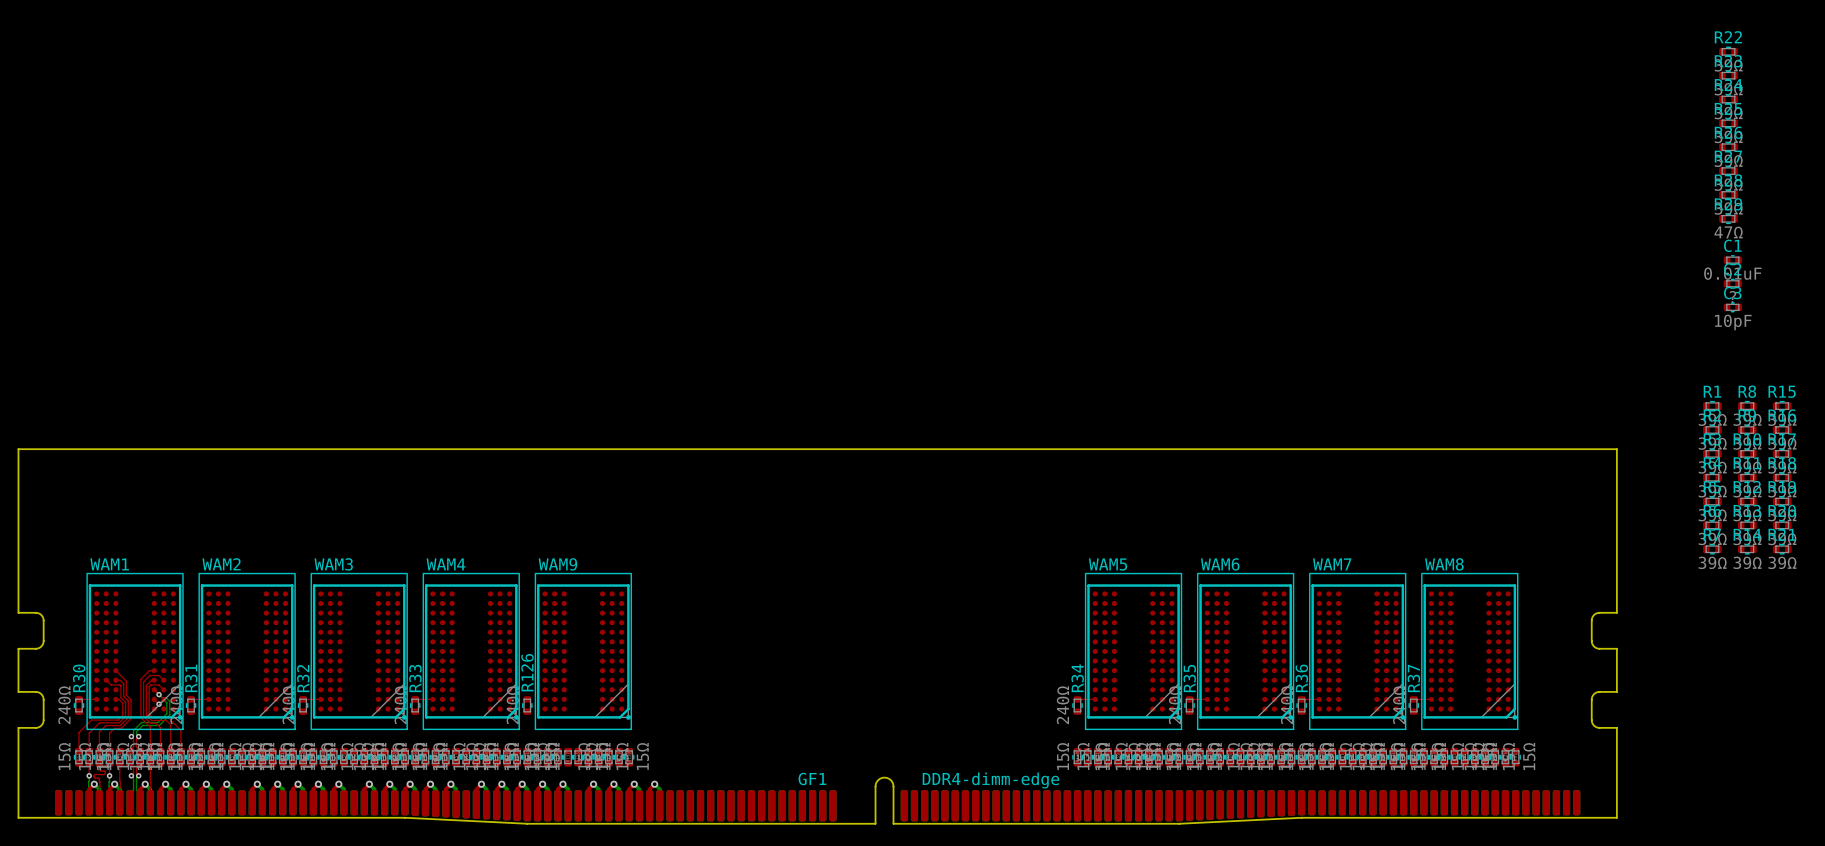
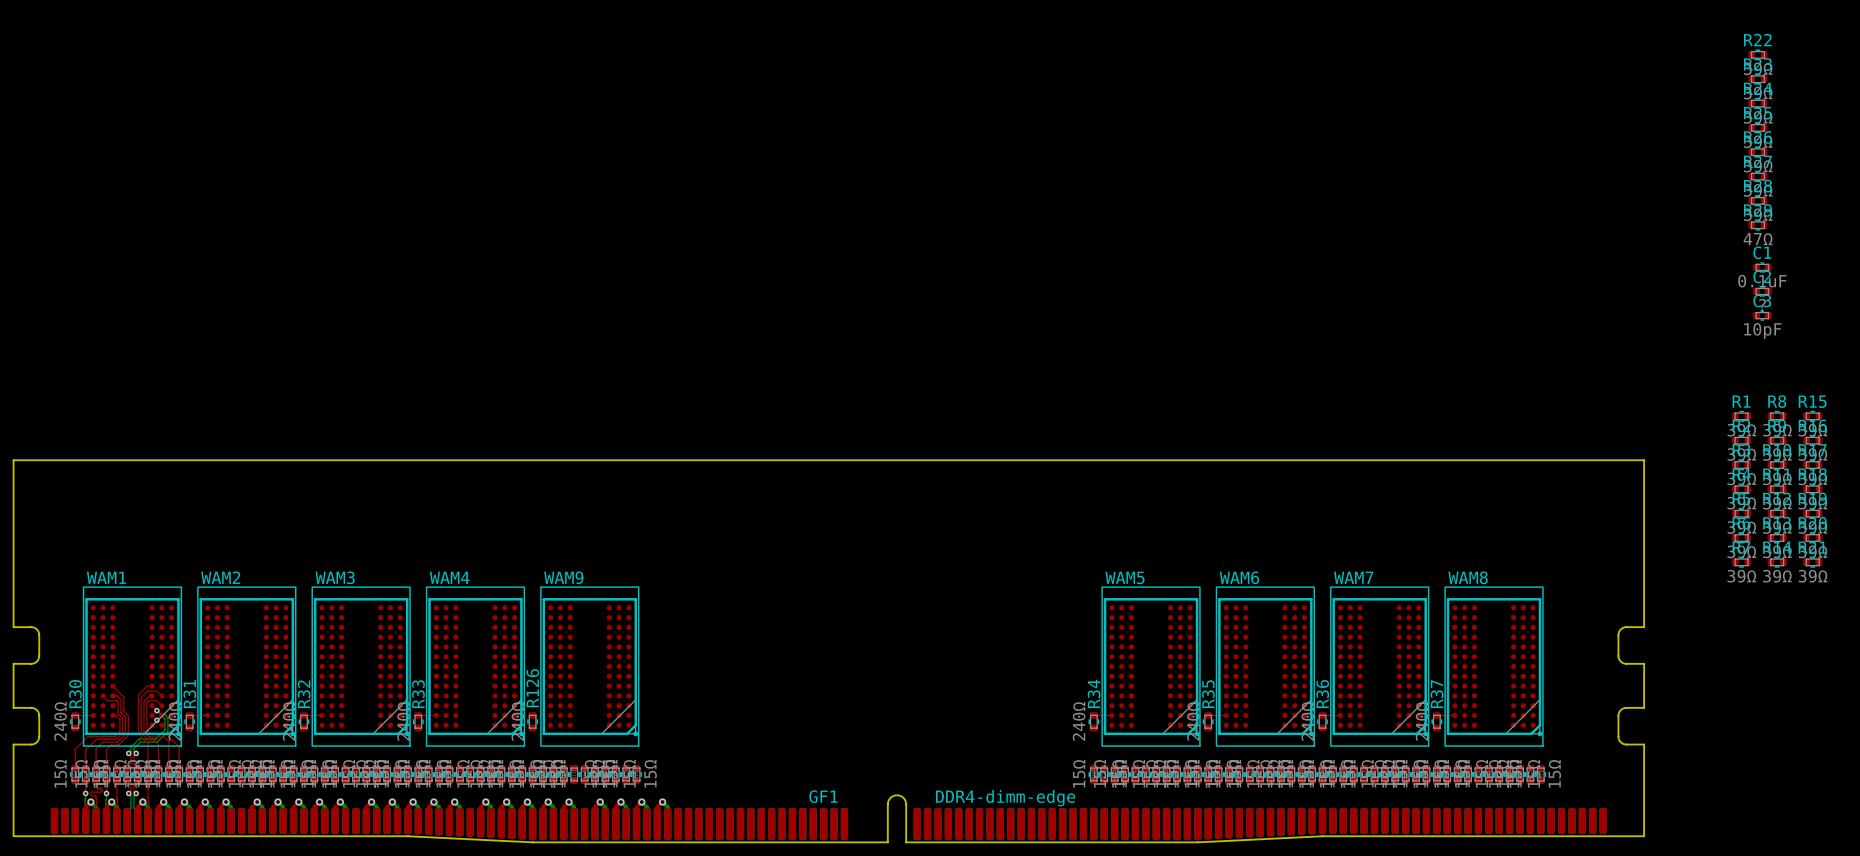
C1 value: 0.01uF (1732, 273) -> 0.1uF (1762, 281)

